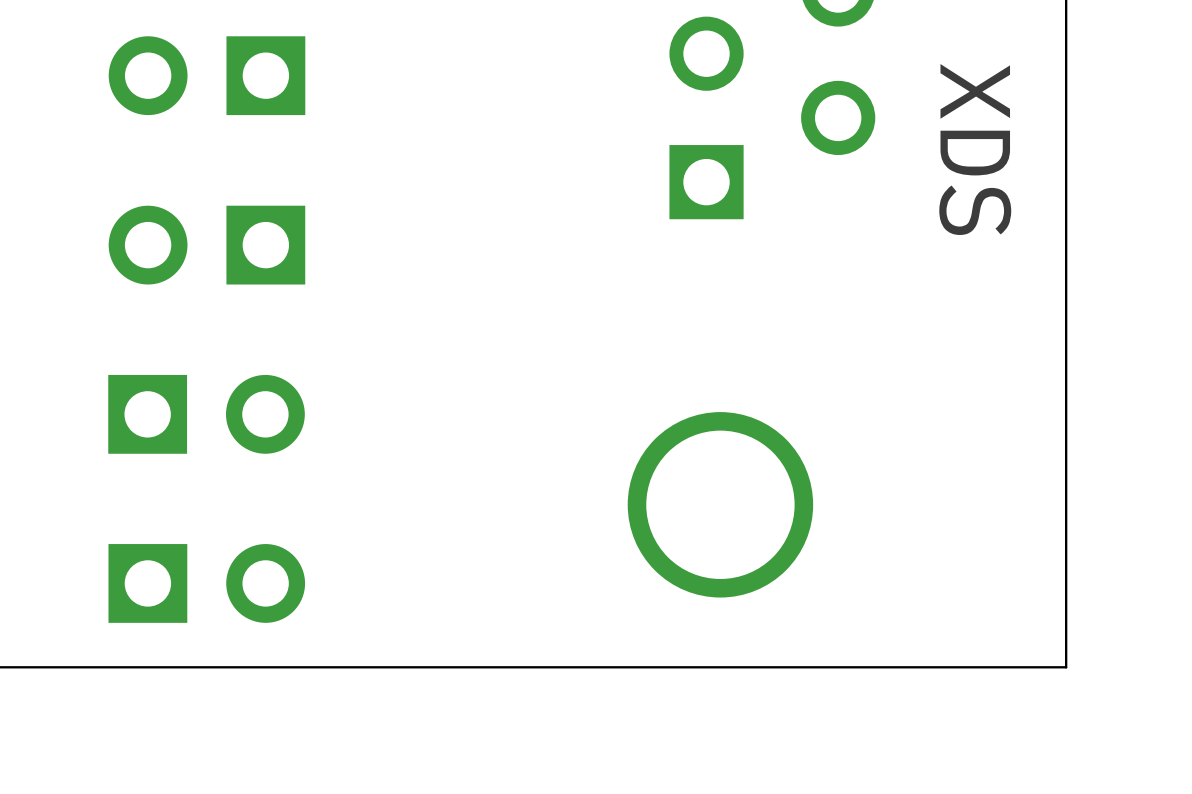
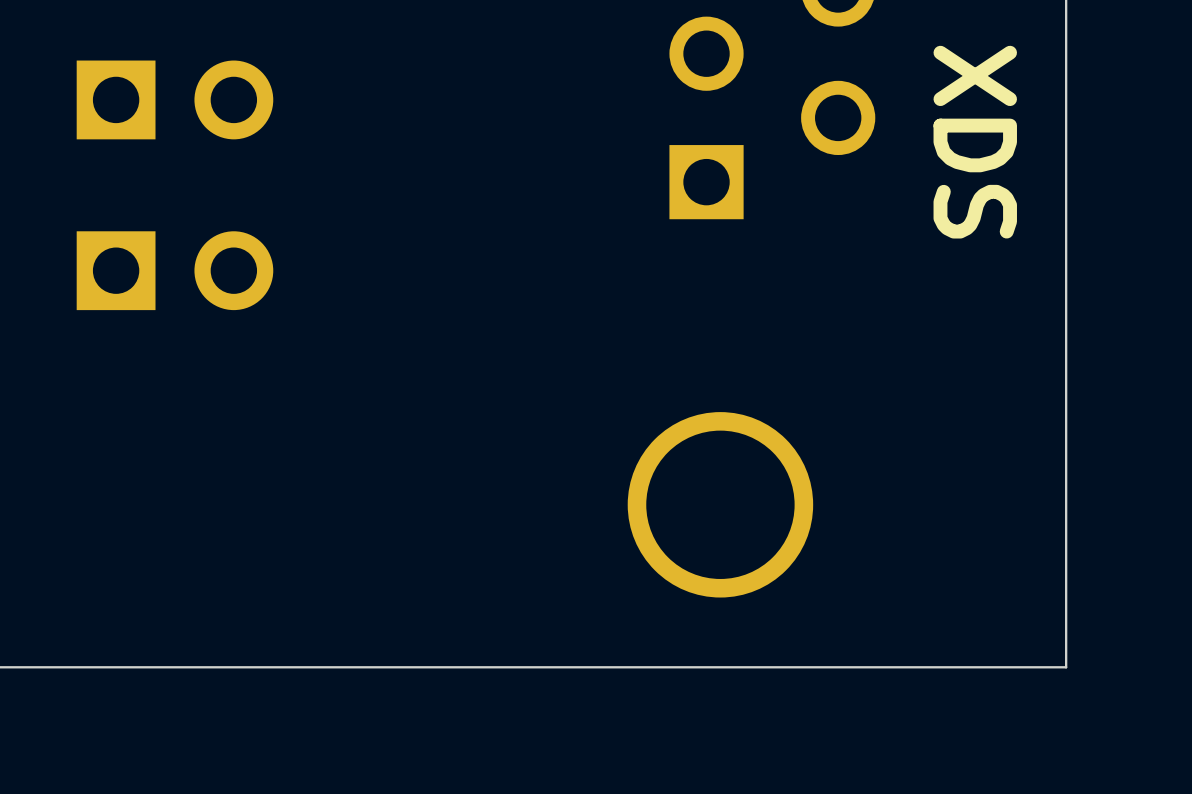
part rotation: 0° (207, 75) -> 180° (174, 99)
part rotation: 0° (206, 245) -> 180° (174, 270)
part: (206, 414) -> none
part: (206, 583) -> none

